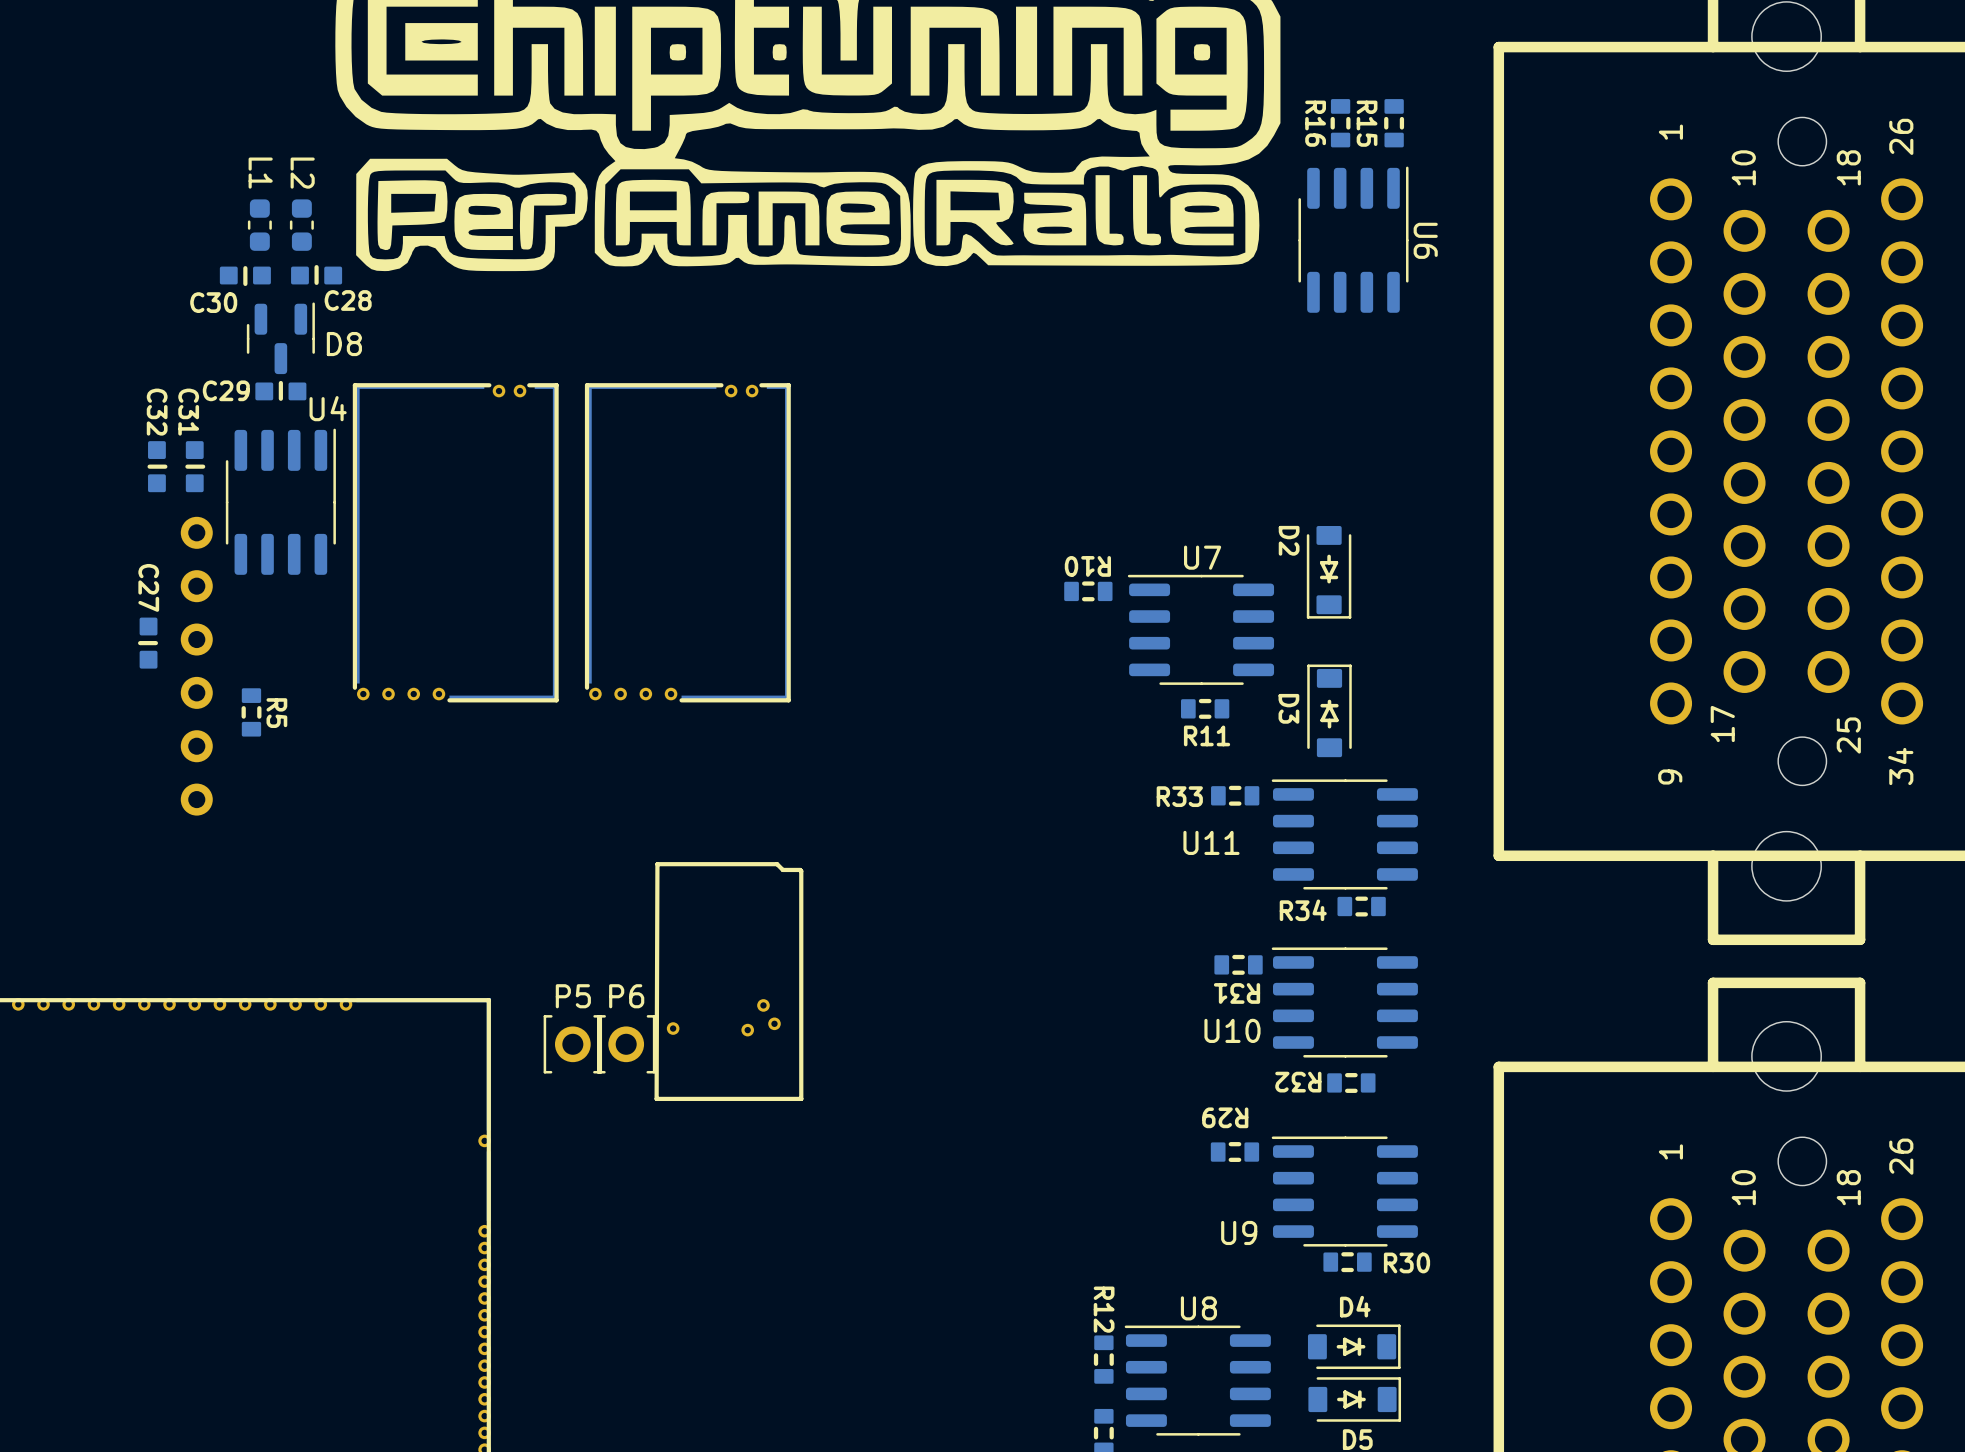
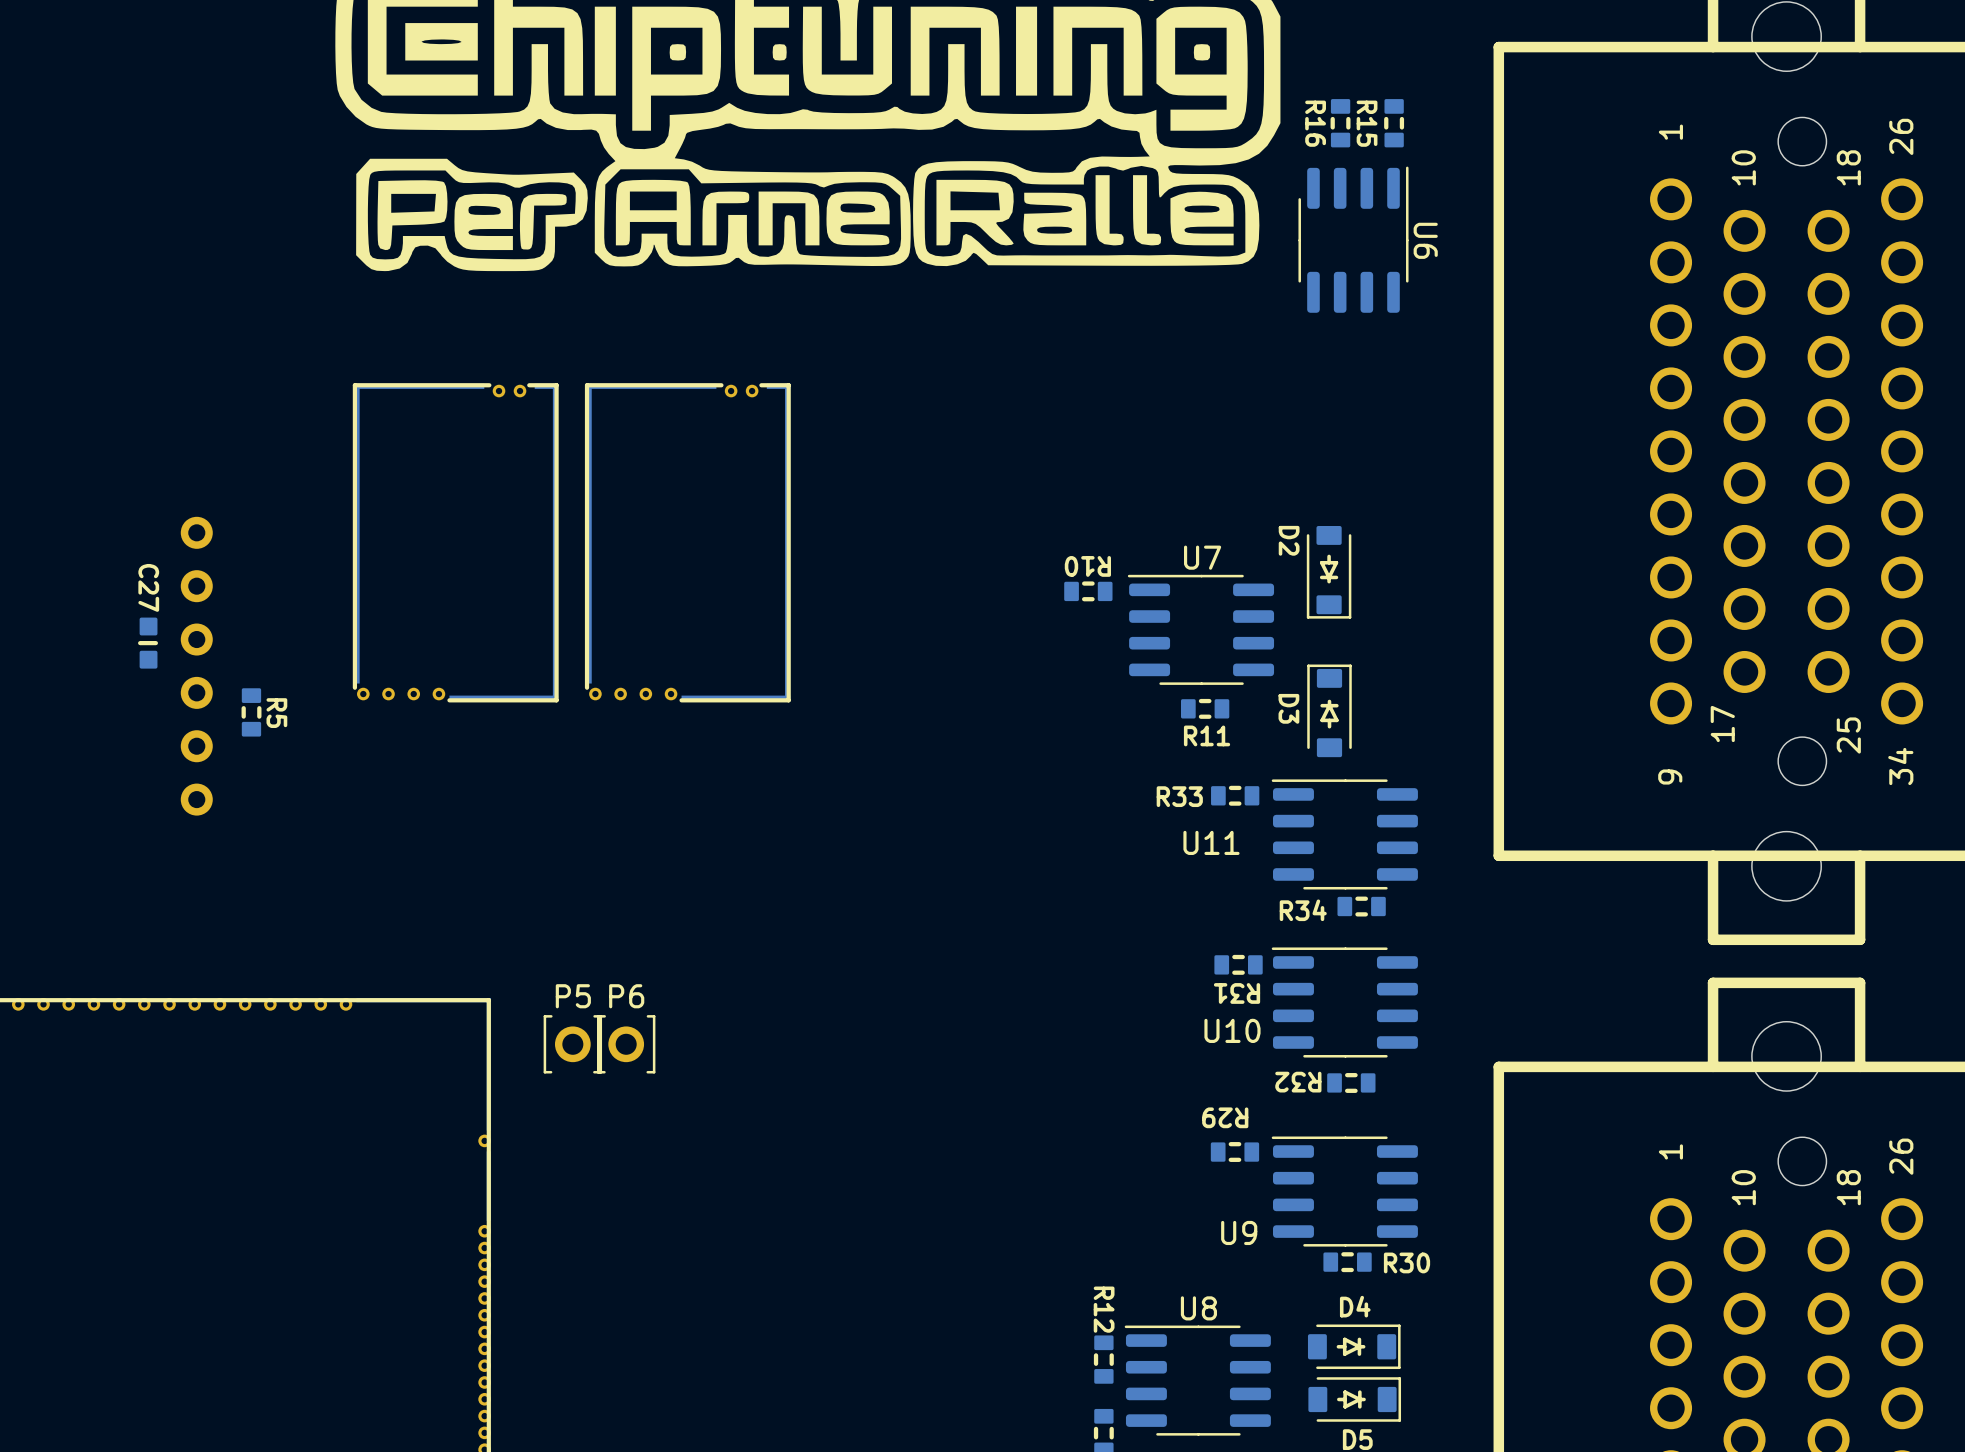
L1: (259, 225) -> none
L2: (301, 225) -> none
C28: (316, 274) -> none
C30: (245, 276) -> none
D8: (280, 338) -> none
C29: (280, 390) -> none
C32: (157, 466) -> none
C31: (195, 466) -> none
U4: (280, 501) -> none
part: (729, 981) -> none

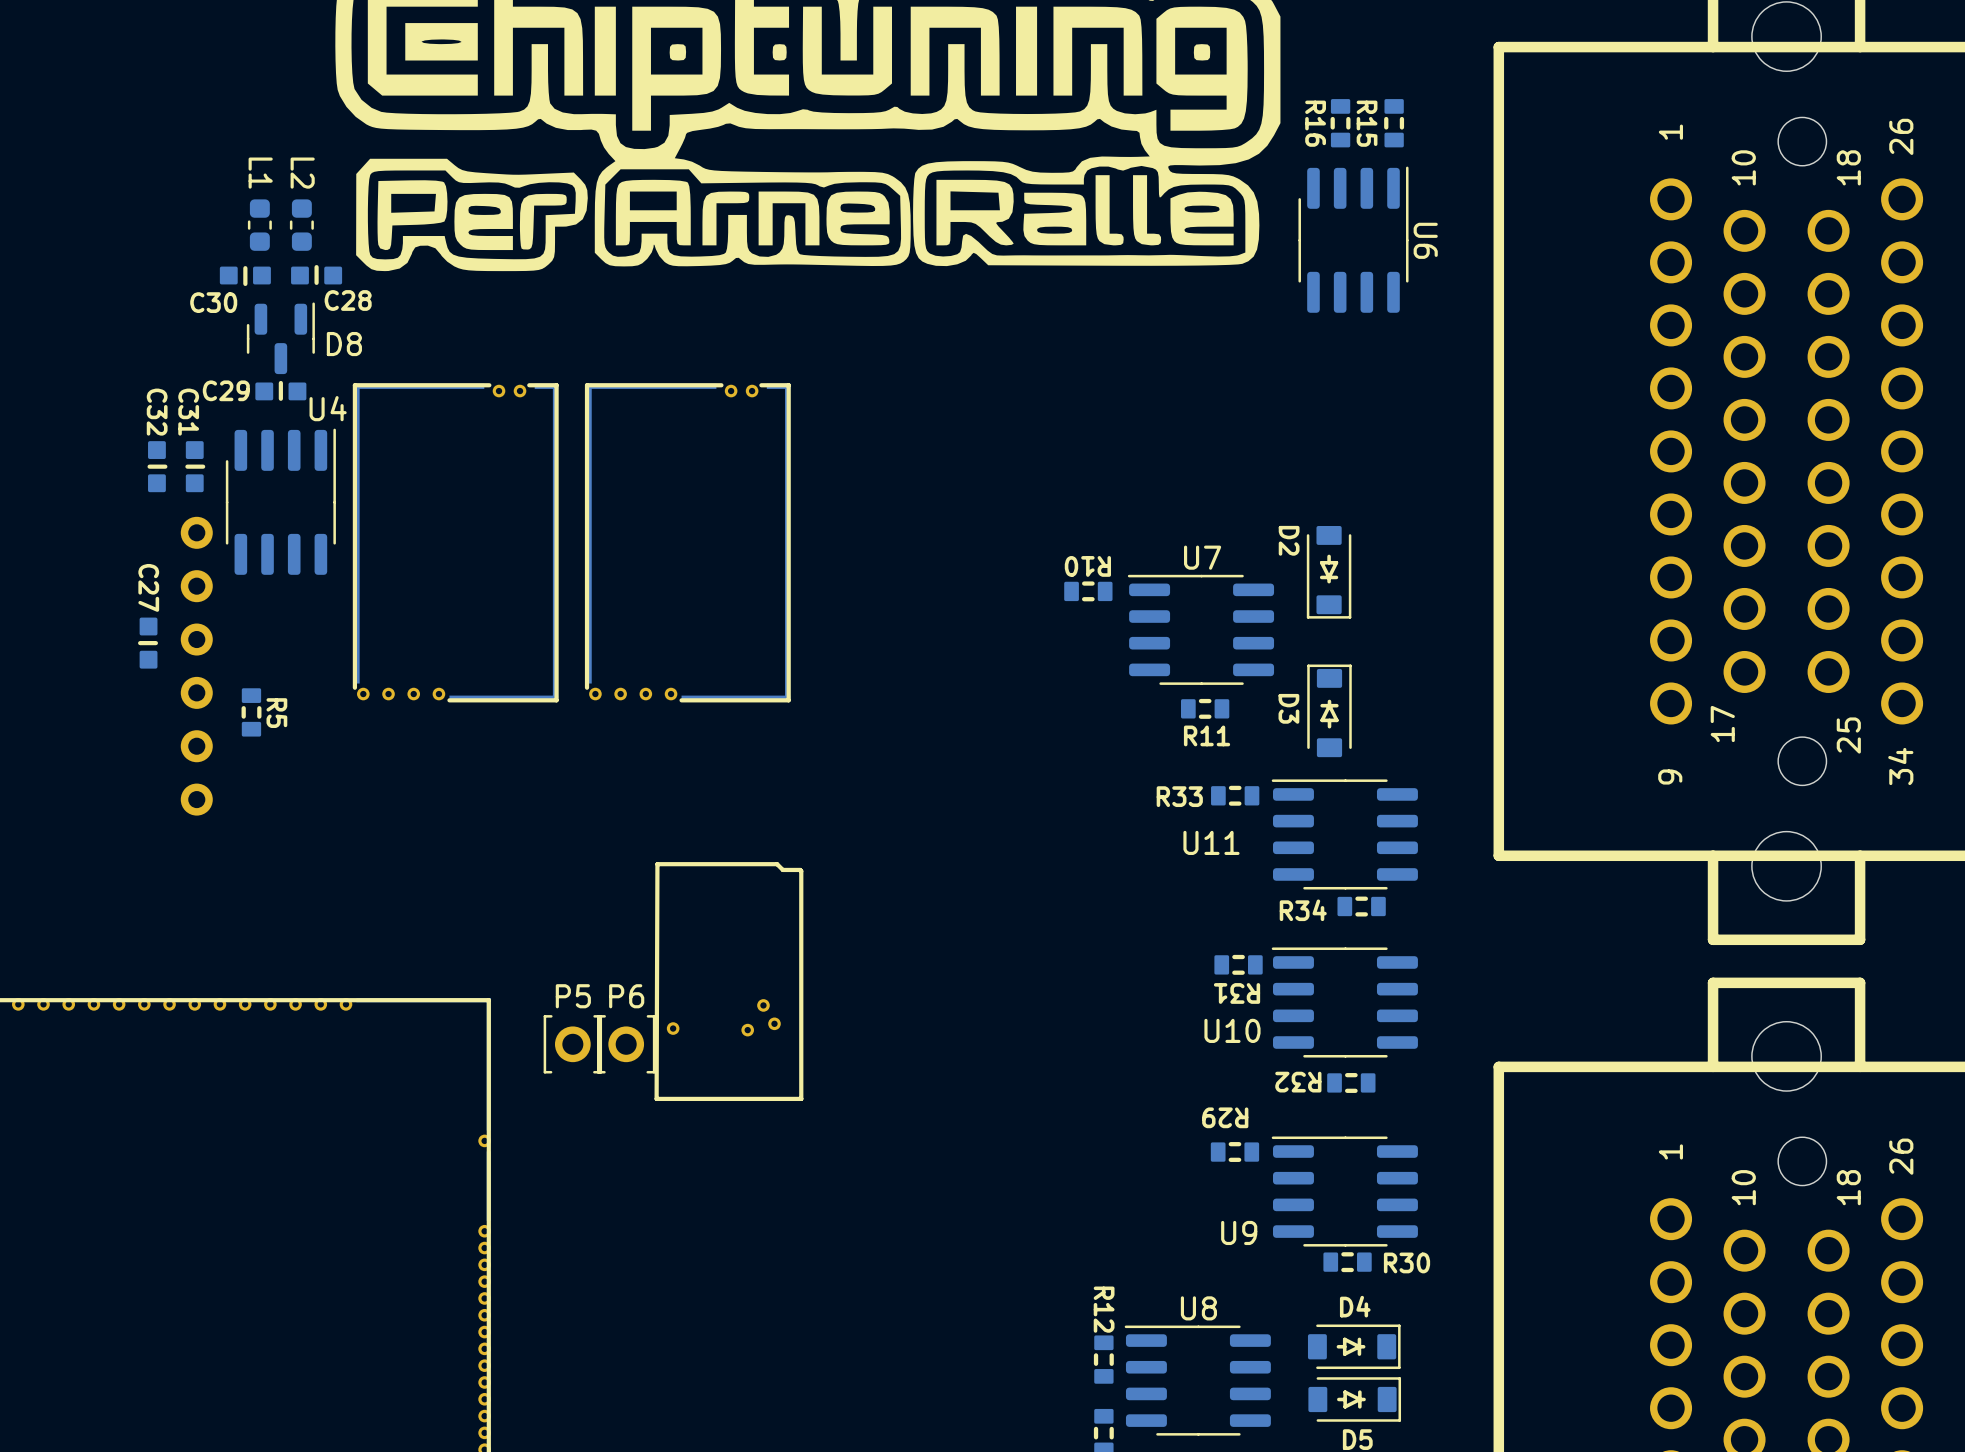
L1: none -> (259, 225)
L2: none -> (301, 225)
C28: none -> (316, 274)
C30: none -> (245, 276)
D8: none -> (280, 338)
C29: none -> (280, 390)
C32: none -> (157, 466)
C31: none -> (195, 466)
U4: none -> (280, 501)
part: none -> (729, 981)

